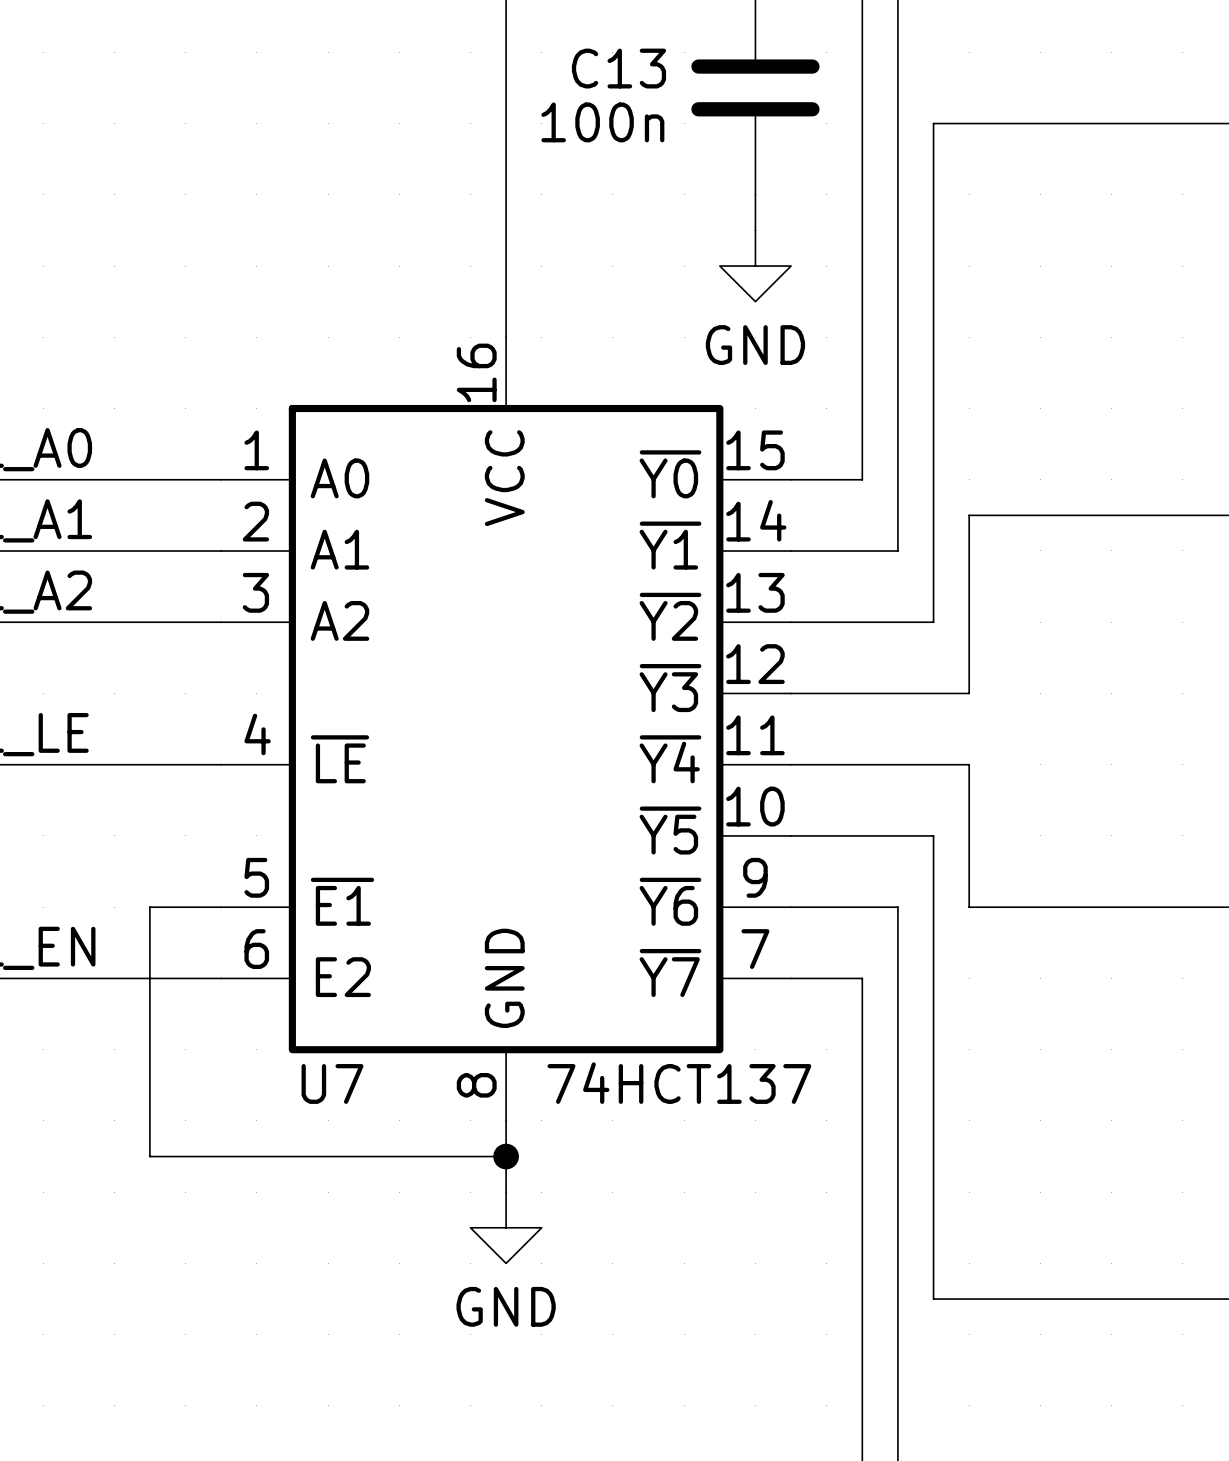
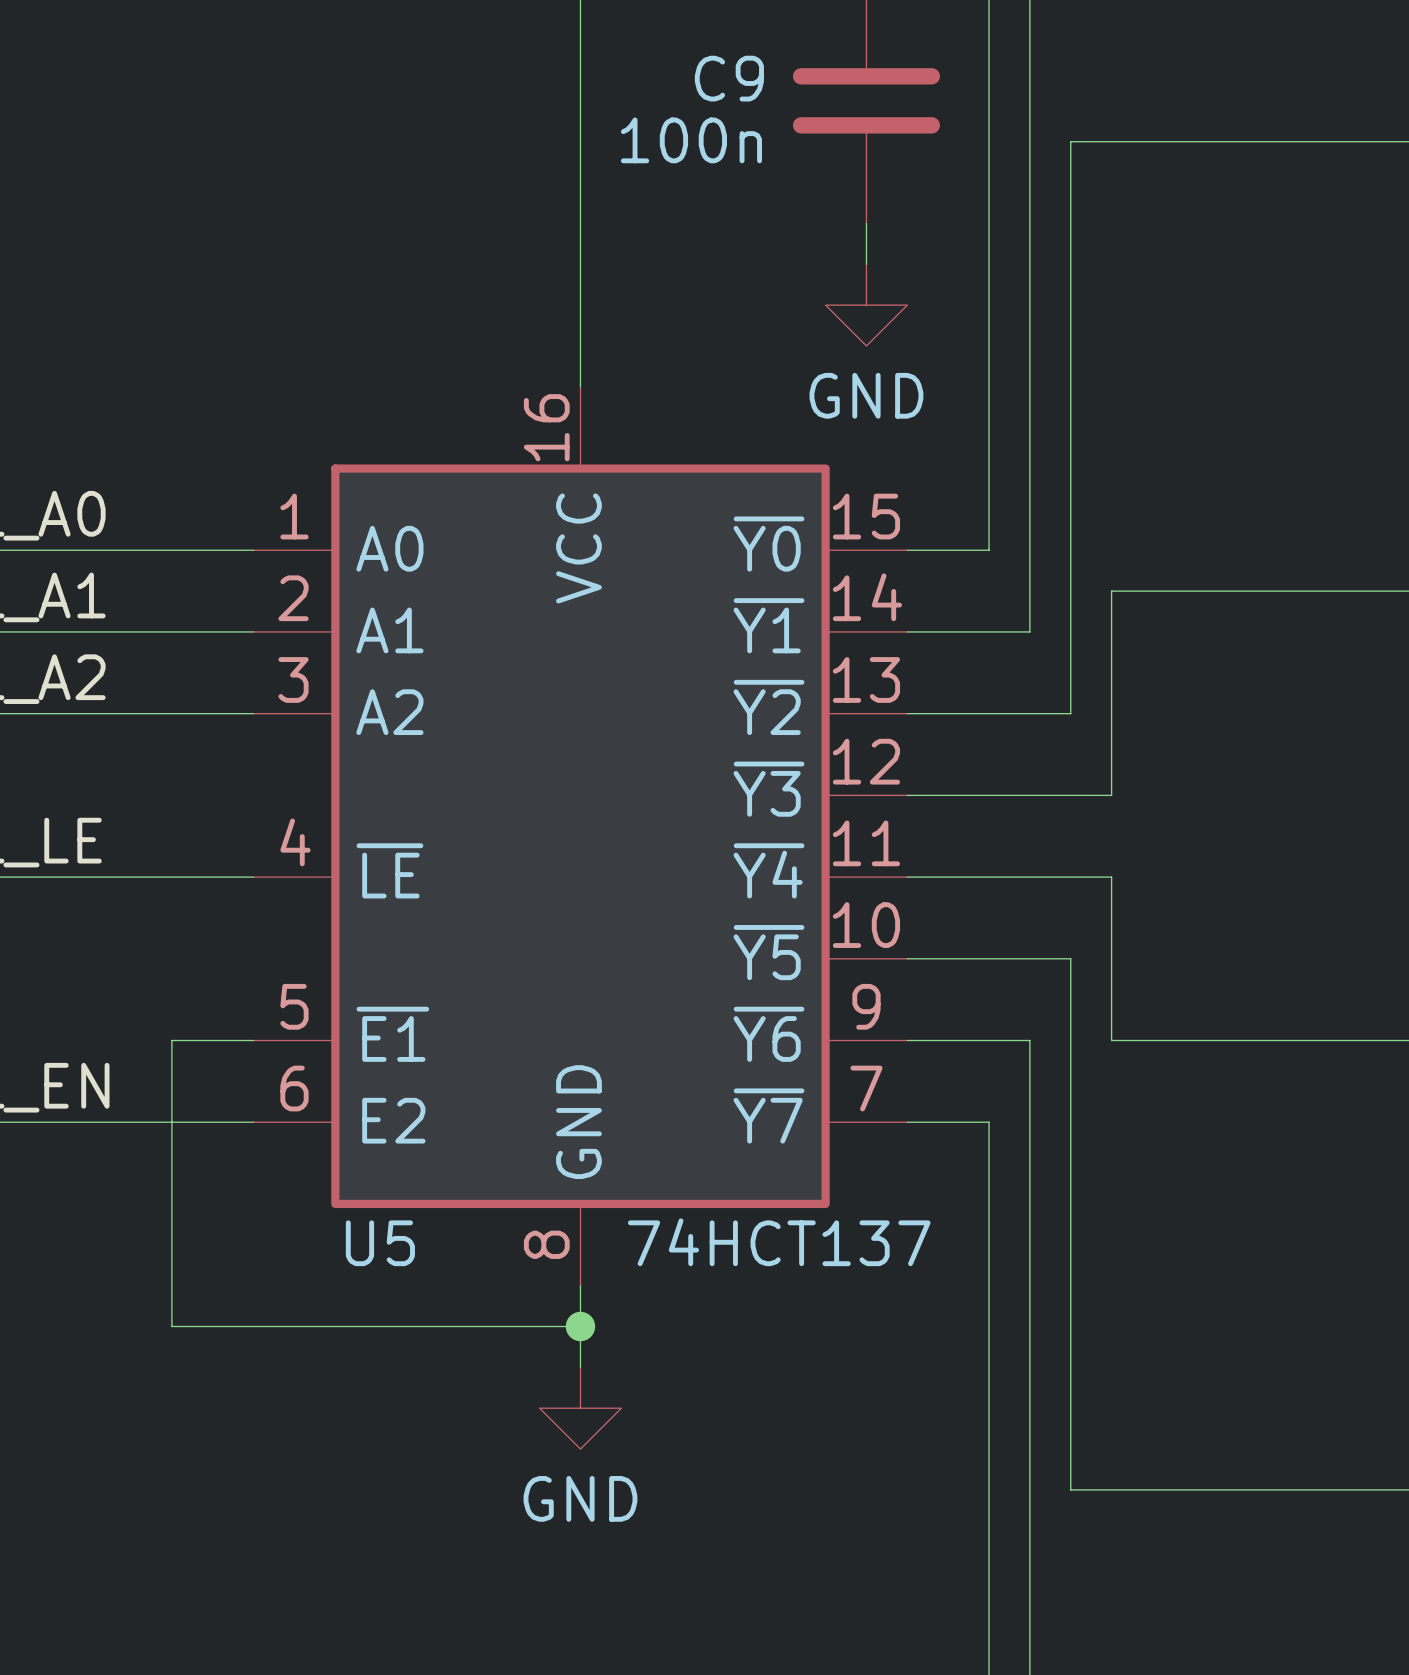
C13 name: C13 (618, 68) -> C9 (729, 78)
U7 name: U7 (332, 1083) -> U5 (380, 1243)

